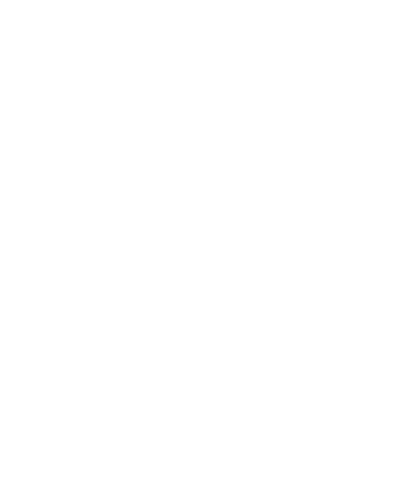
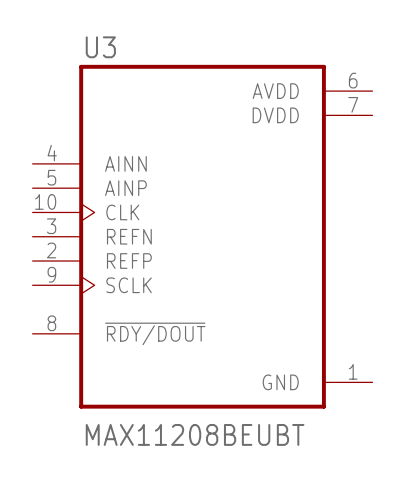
U3: none -> MAX11208BEUBT (202, 236)

